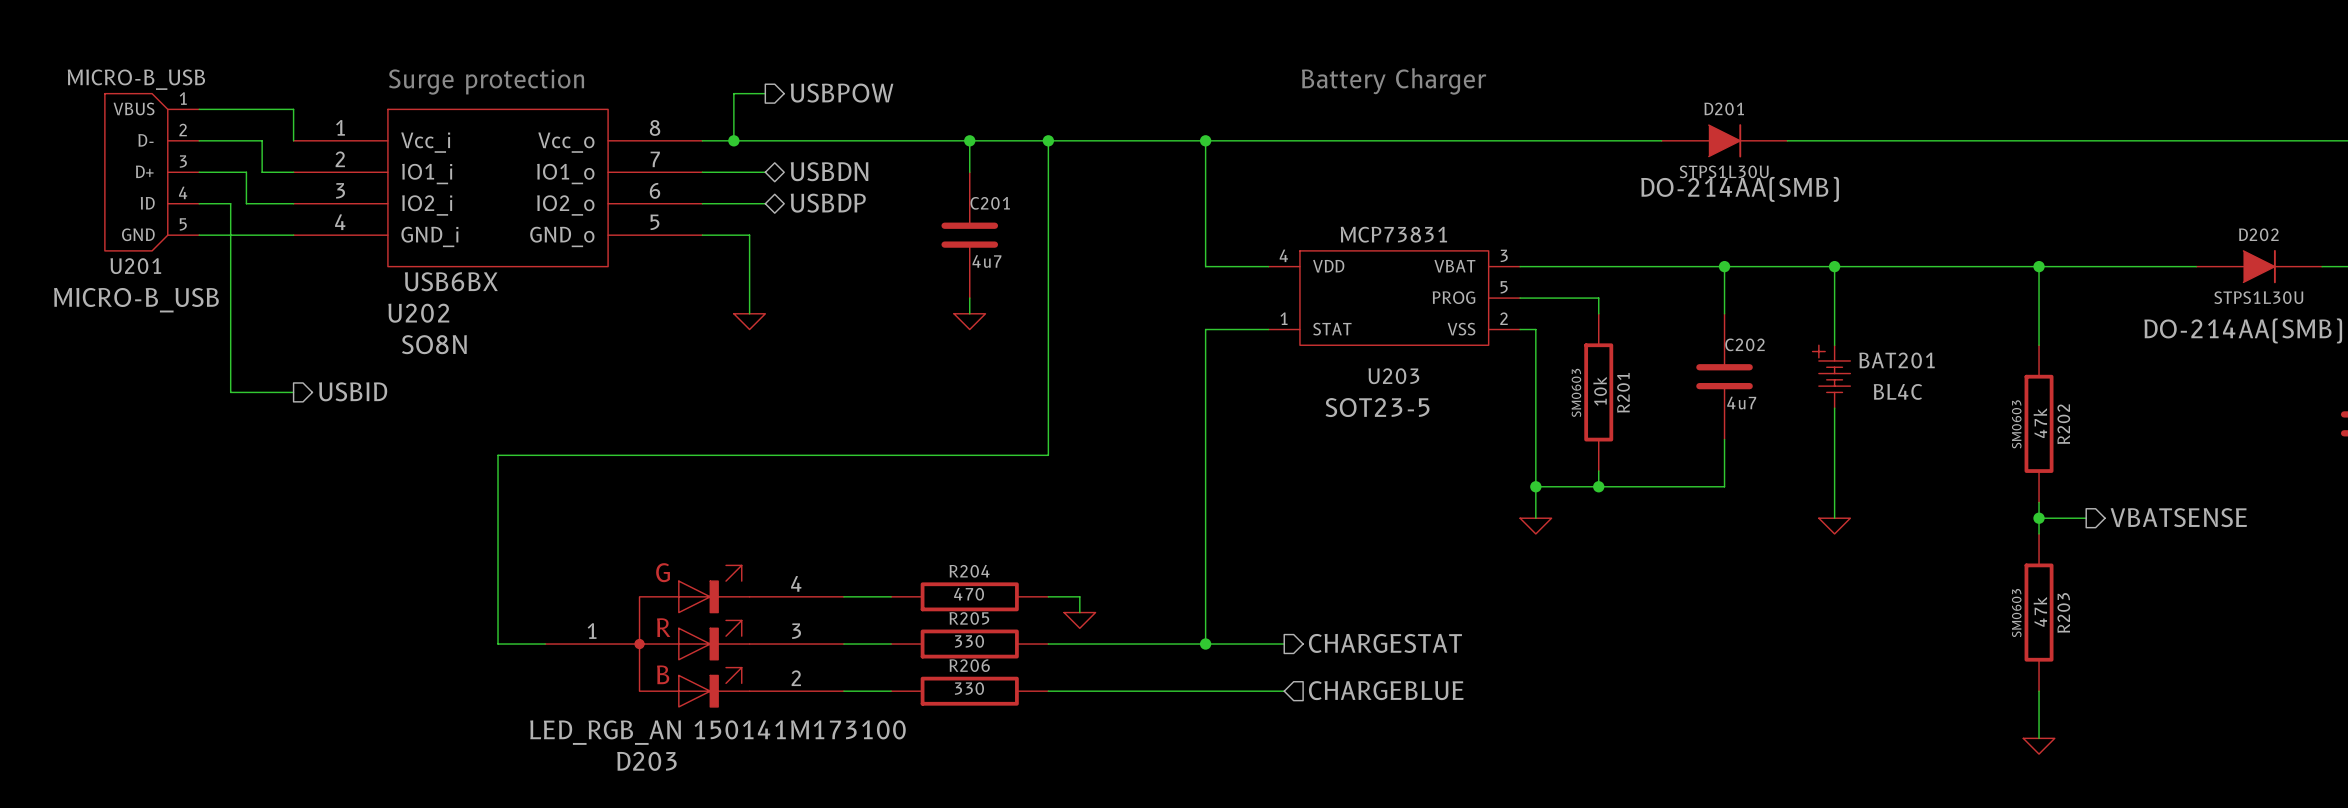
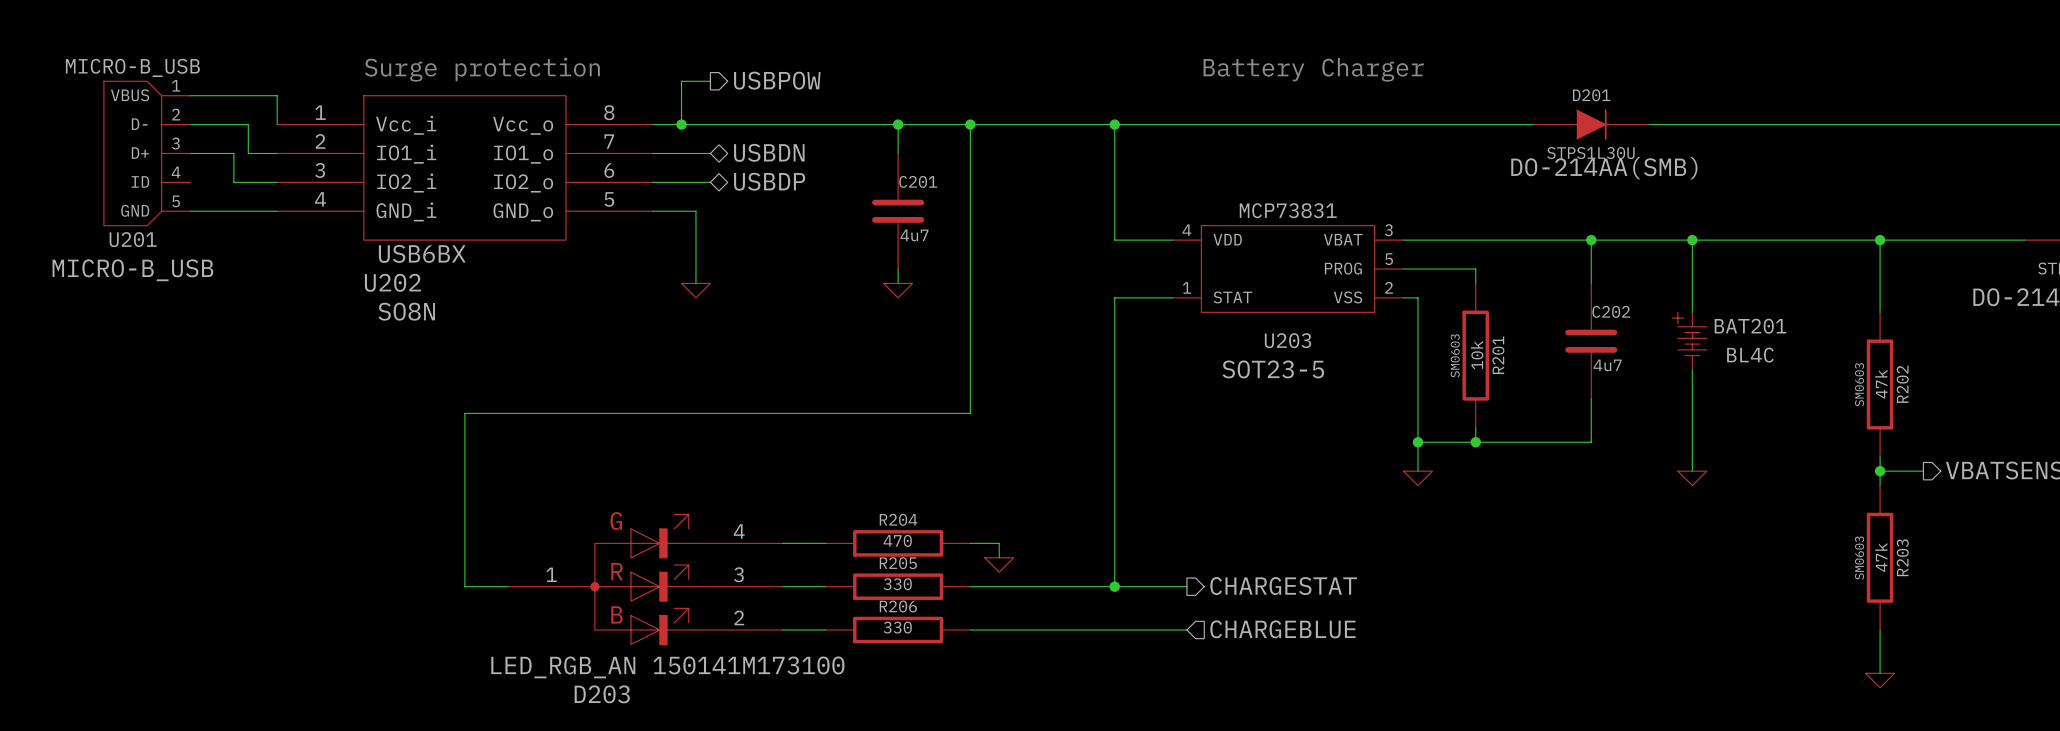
wire: (199, 203) (230, 203) (230, 392) (293, 392) -> none
hierarchical label: USBID (353, 391) -> none

